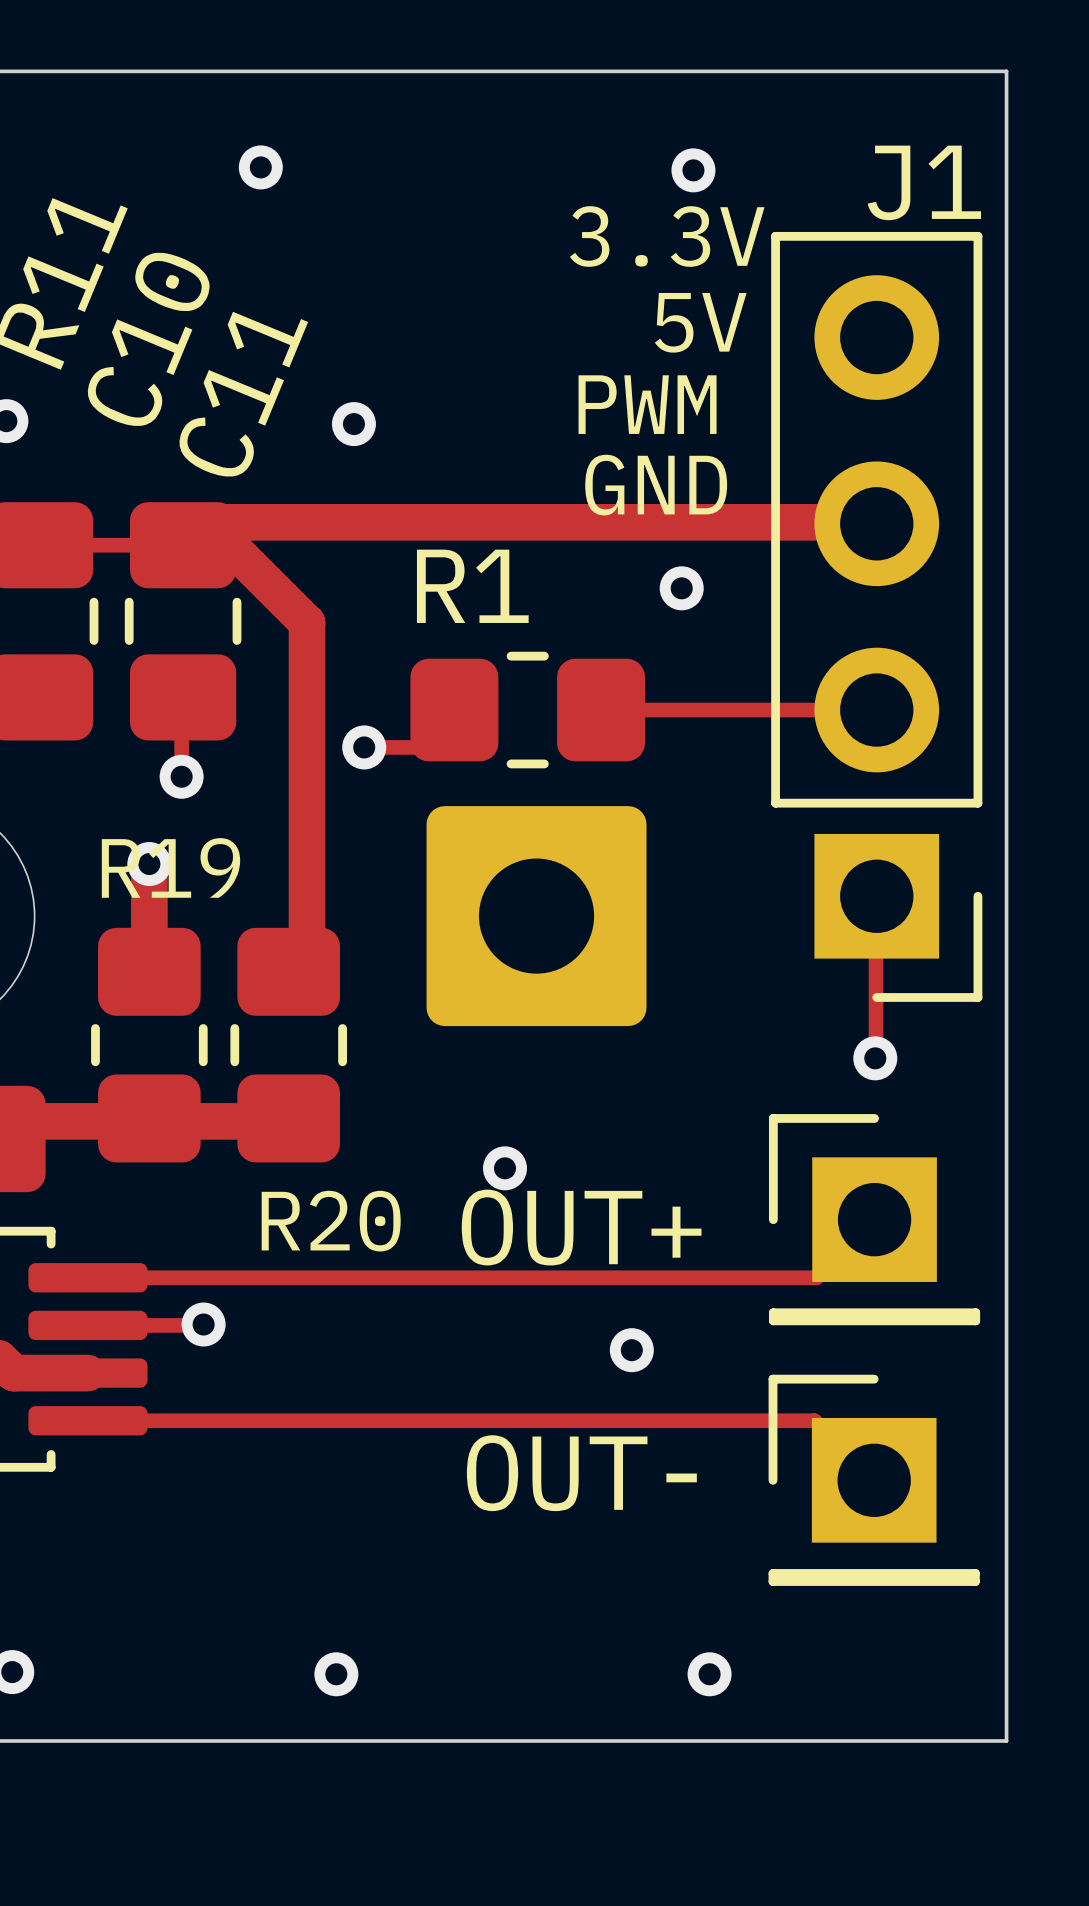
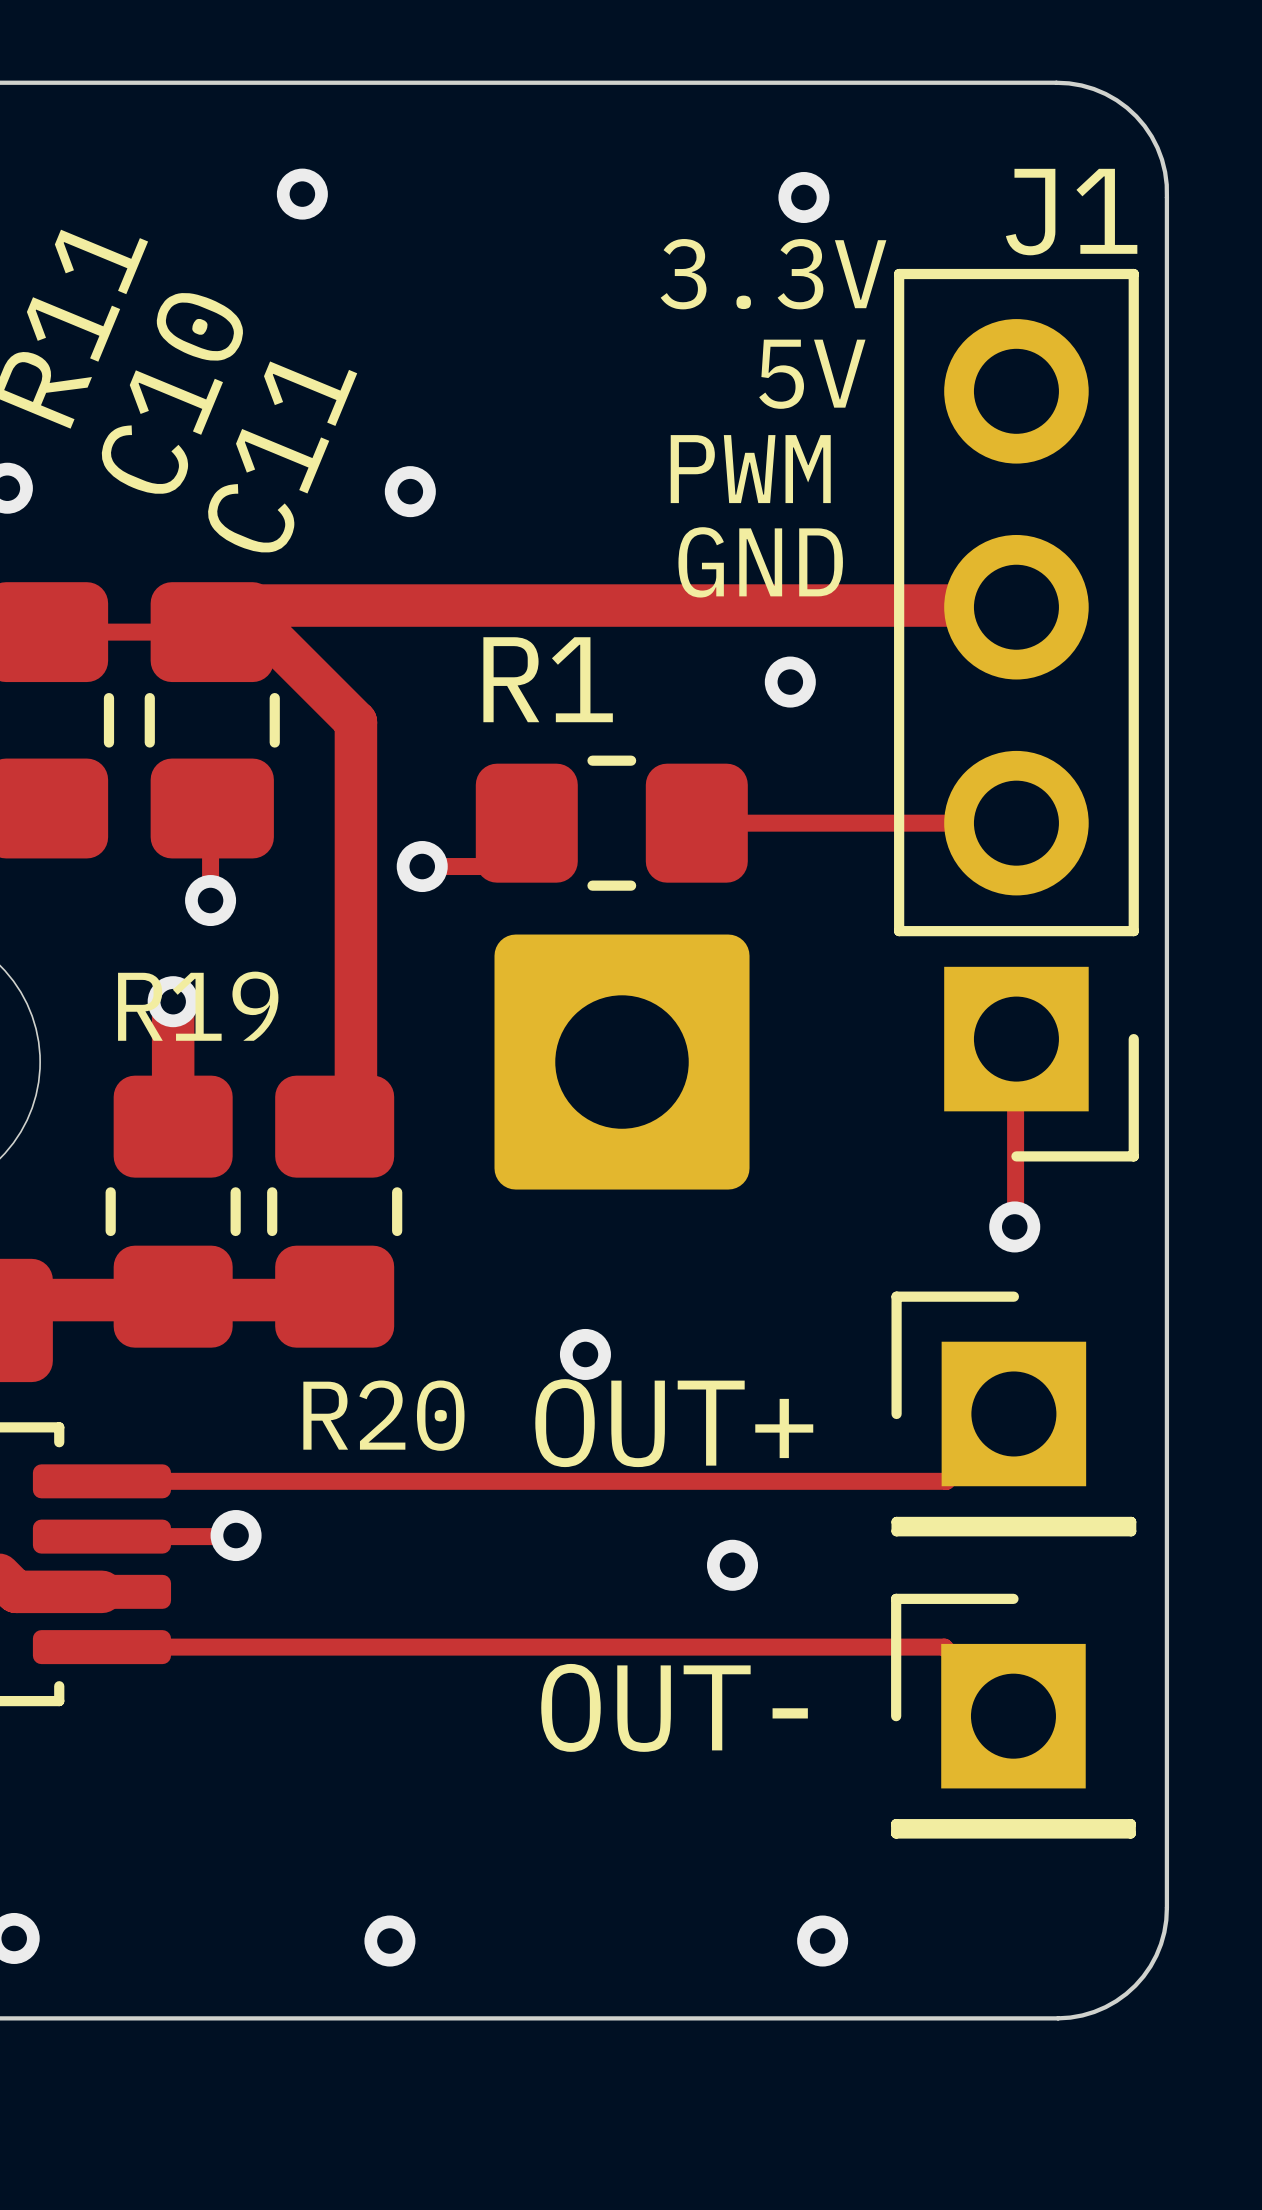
board edge: (911, 71) (1006, 71) (1006, 170) -> (1056, 82) (1093, 89) (1116, 100) (1136, 116) (1151, 136) (1162, 159) (1166, 197)
board edge: (1006, 1645) (1006, 1741) (912, 1741) -> (1166, 1907) (1161, 1944) (1150, 1966) (1135, 1985) (1105, 2007) (1082, 2015) (1058, 2018)

